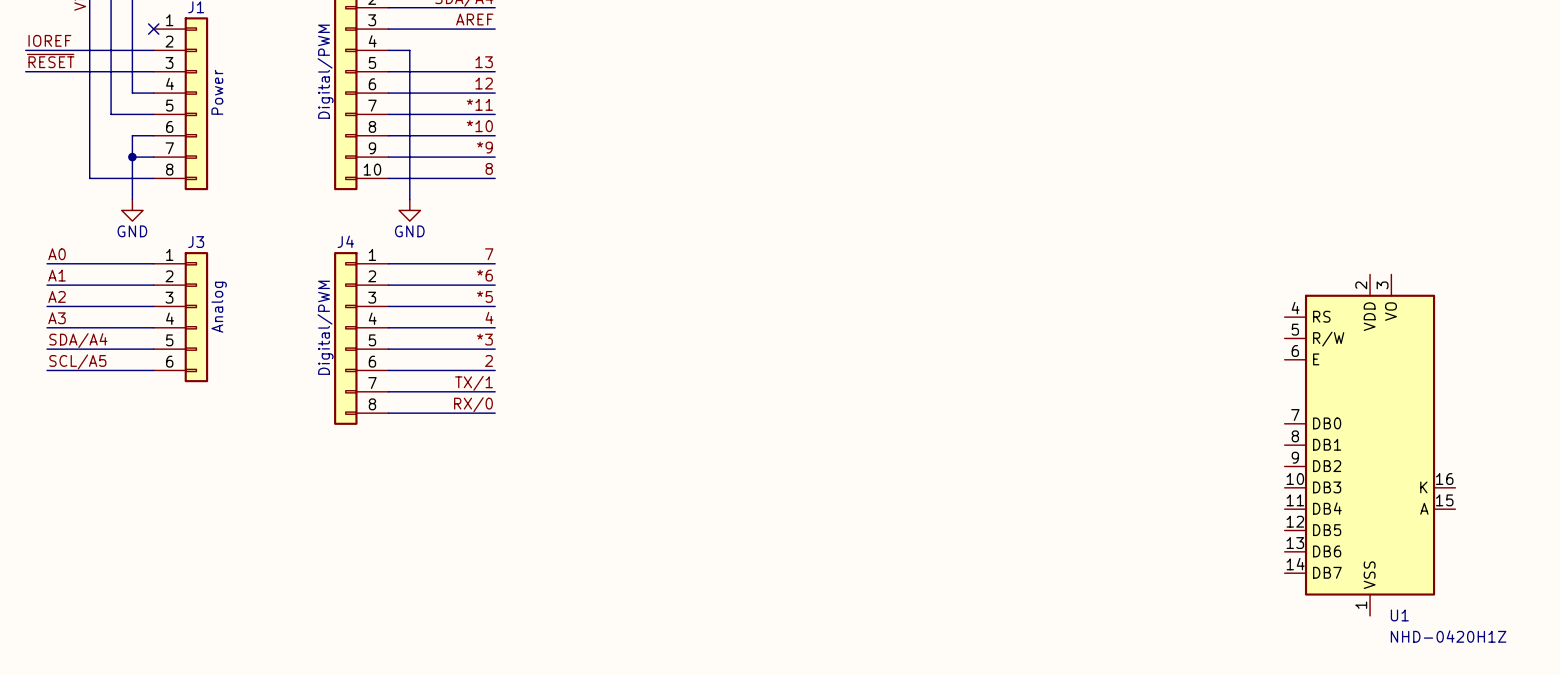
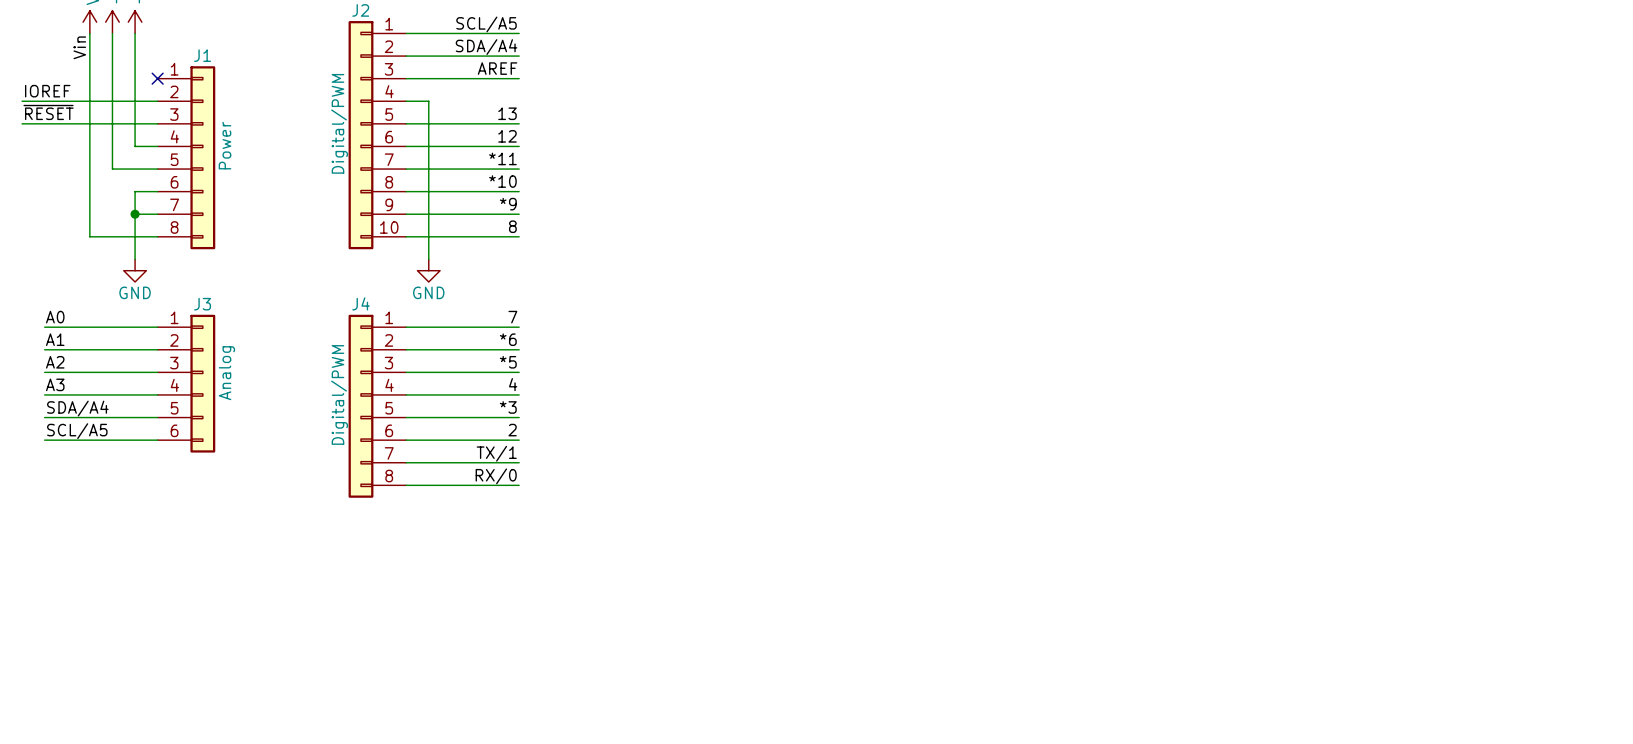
U1: NHD-0420H1Z (1370, 445) -> none

